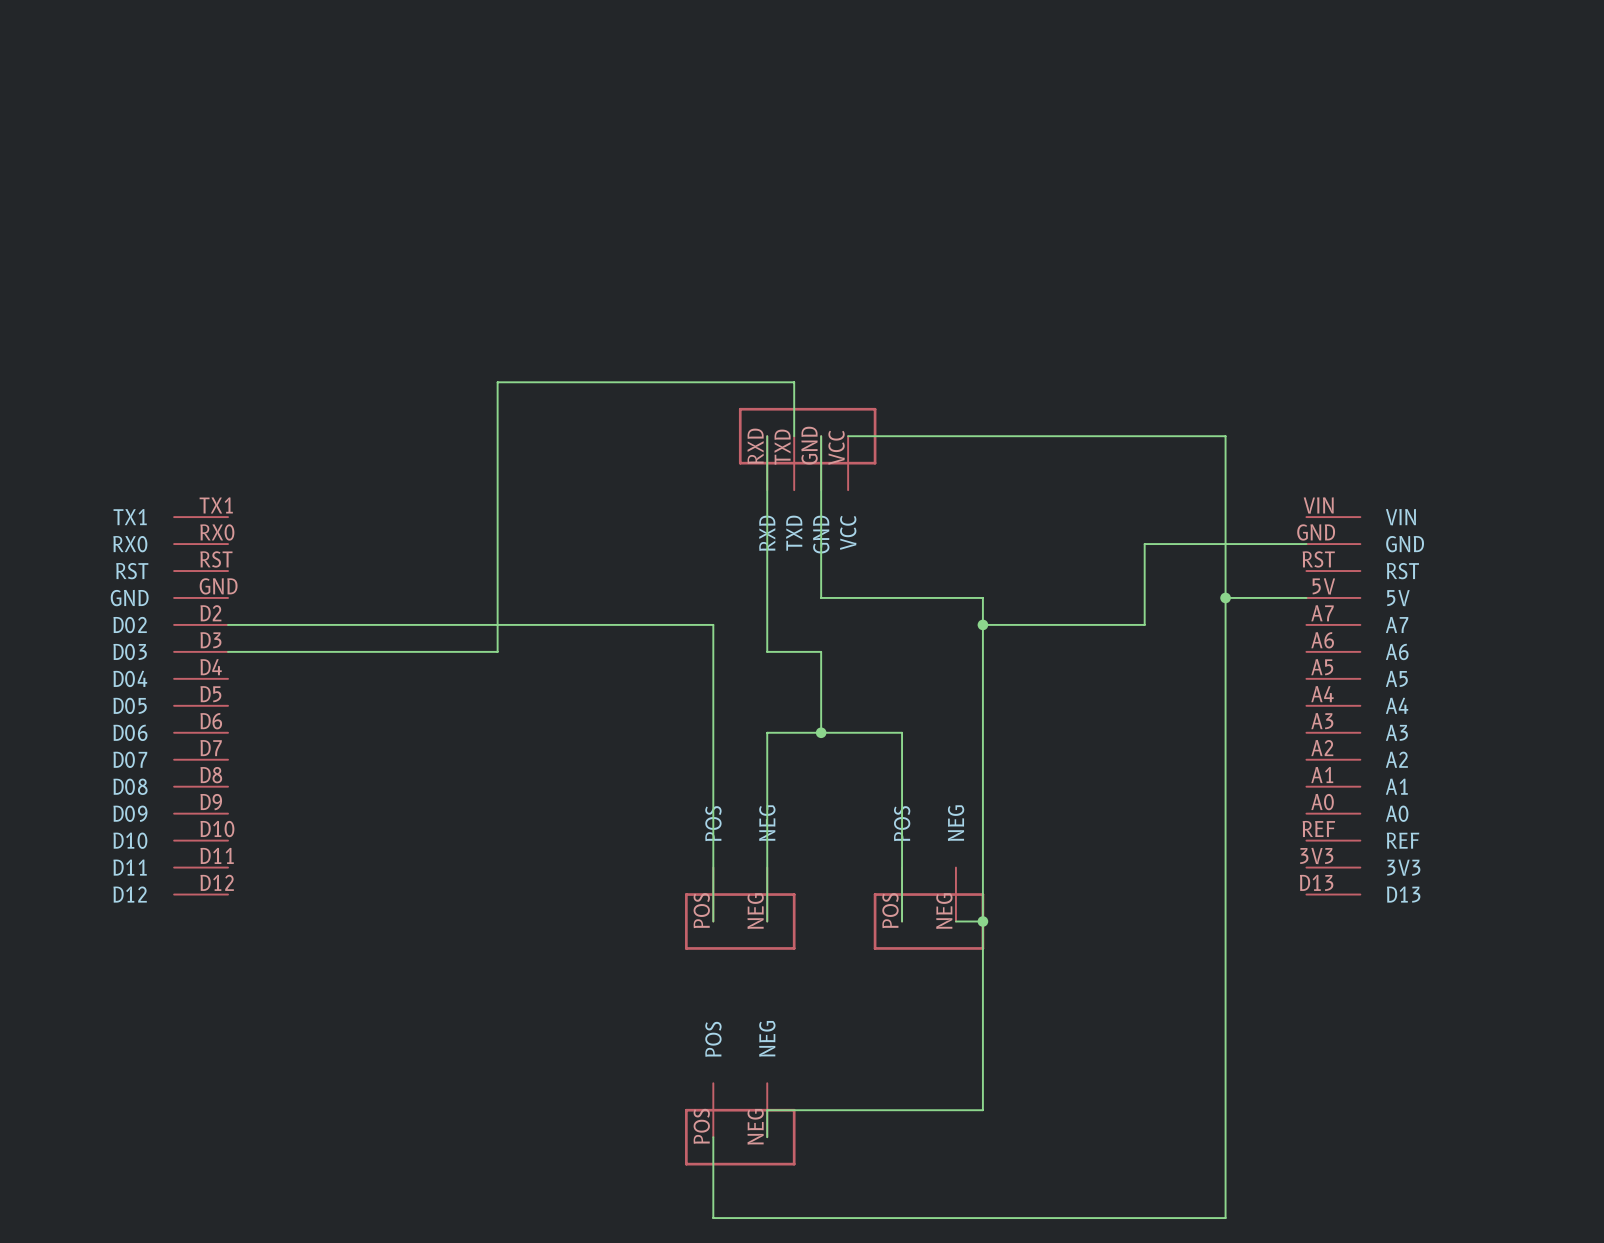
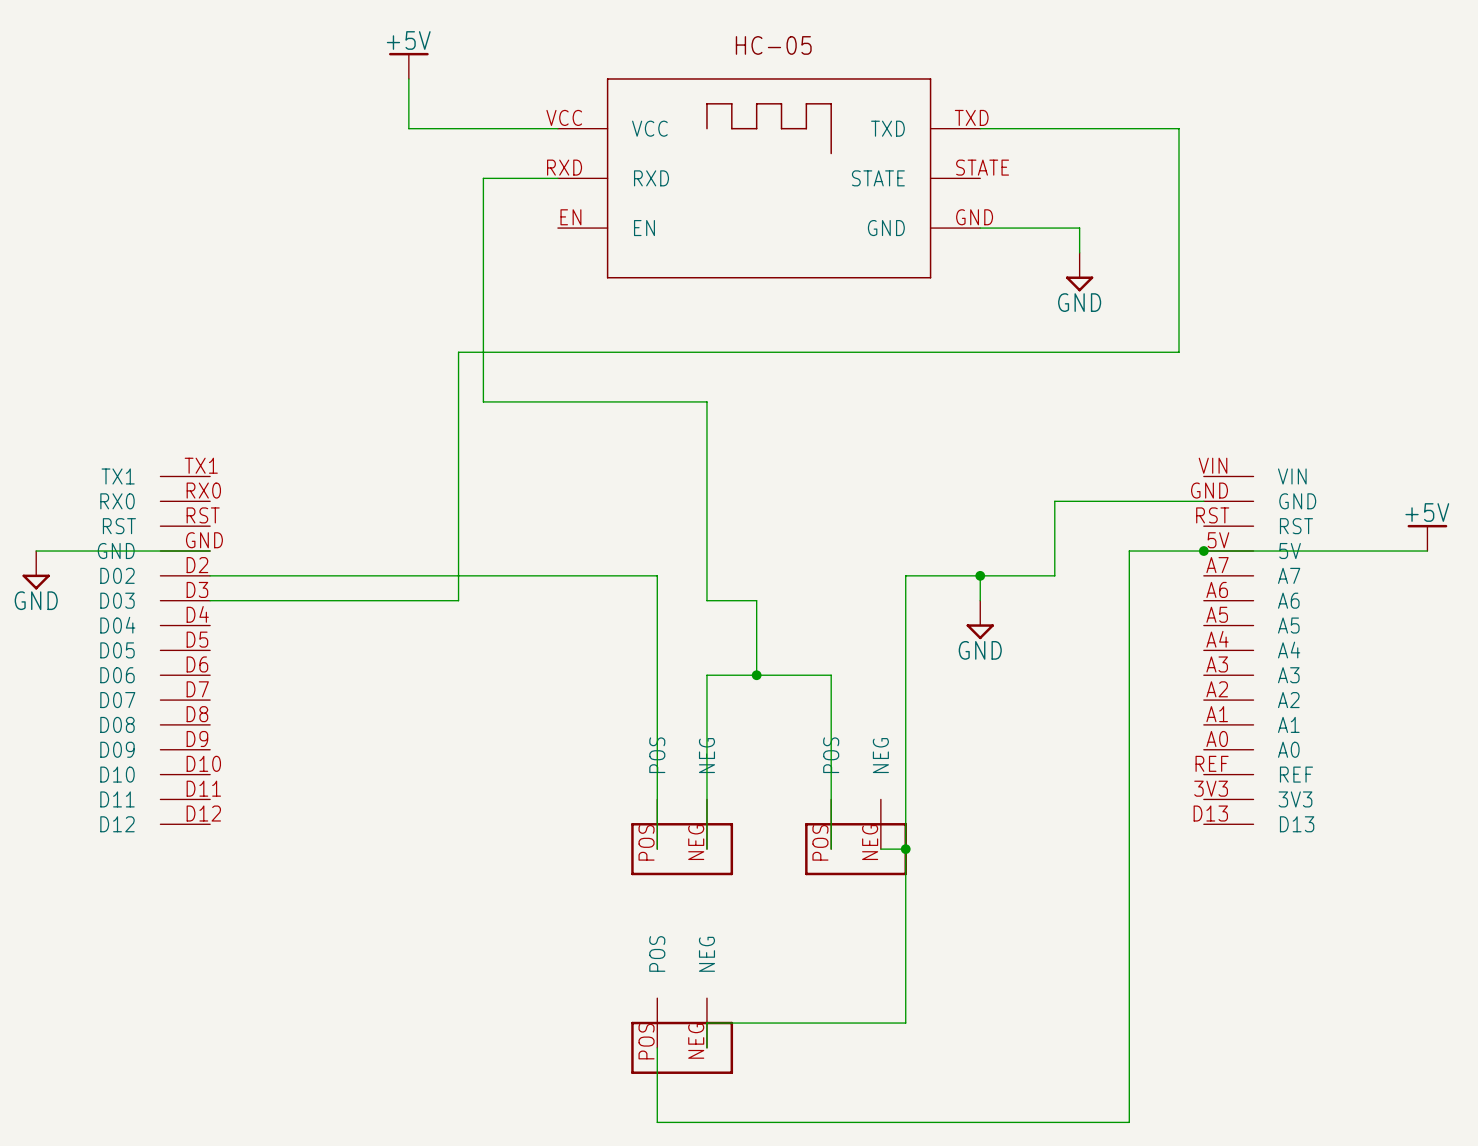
power symbol: none -> +5V (408, 65)
wire: none -> (408, 78) (408, 128) (557, 128)
wire: none -> (557, 178) (483, 178) (483, 401) (706, 401)
part: none -> (769, 178)
wire: none -> (980, 228) (1079, 228) (1079, 252)
power symbol: none -> GND (1079, 272)
wire: (794, 382) (794, 436) -> (731, 352) (1179, 352) (1179, 128) (980, 128)
wire: (821, 436) (821, 597) (982, 597) (982, 624) -> none
wire: (848, 436) (1225, 436) (1225, 597) -> none
part: (807, 449) -> none
power symbol: none -> +5V (1427, 537)
wire: none -> (36, 551) (210, 551)
junction: (1225, 597) -> none
wire: none -> (1203, 551) (1427, 551)
junction: none -> (1203, 551)
power symbol: none -> GND (36, 570)
junction: (982, 624) -> none
wire: none -> (980, 575) (980, 600)
junction: none -> (980, 575)
power symbol: none -> GND (980, 619)

